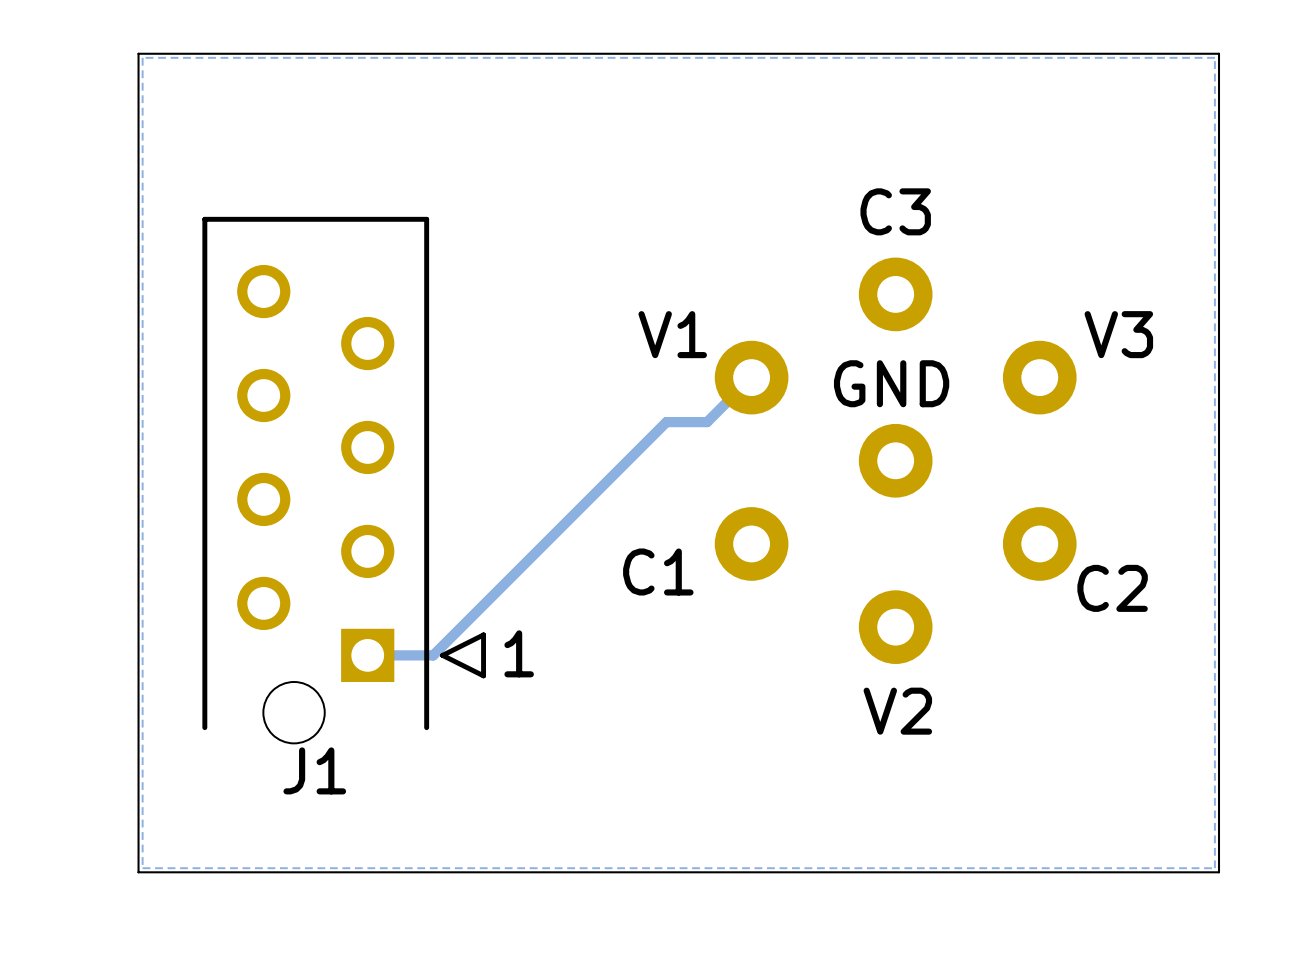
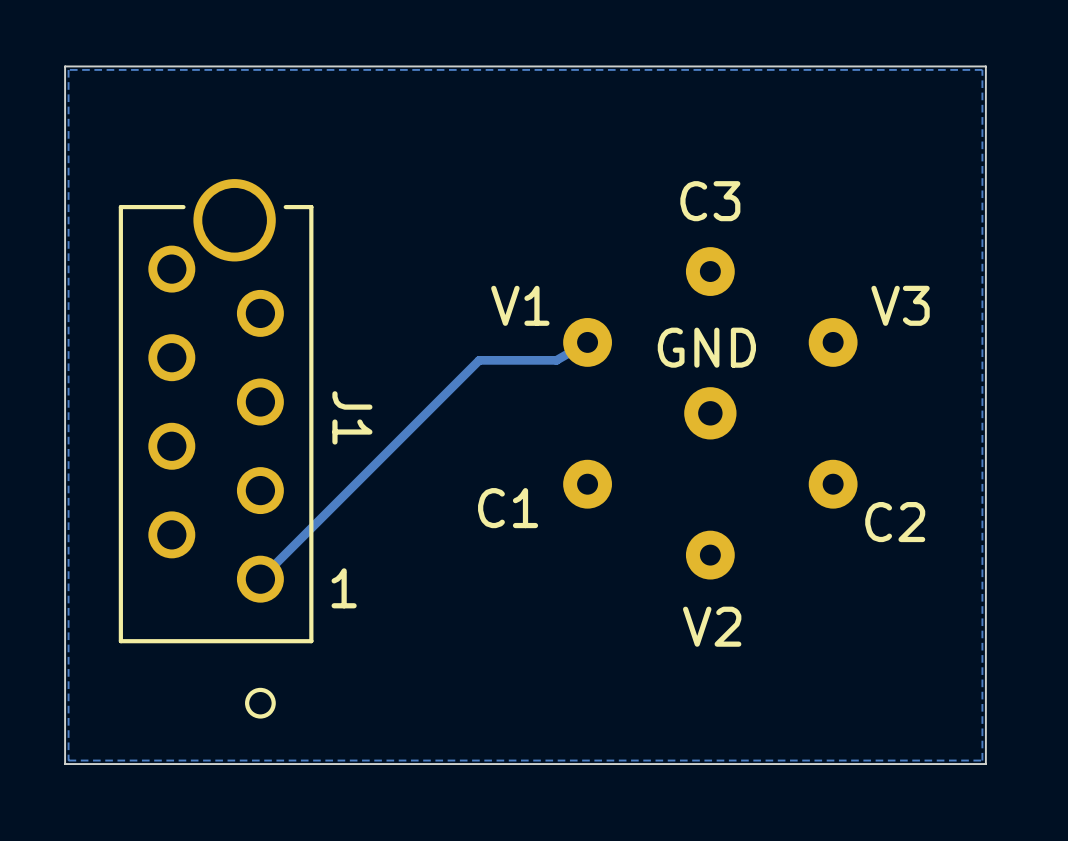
J1 footprint: [202, 216, 487, 744] -> [118, 179, 314, 719]
part footprint: [714, 257, 1077, 664] -> [563, 247, 858, 580]
track: (751, 377) (707, 422) (666, 422) (433, 655) (367, 655) -> (587, 342) (556, 360) (479, 360) (260, 579)
text position: 1 (519, 653) -> 1 (344, 588)
J1 name position: J1 (314, 770) -> J1 (352, 417)

